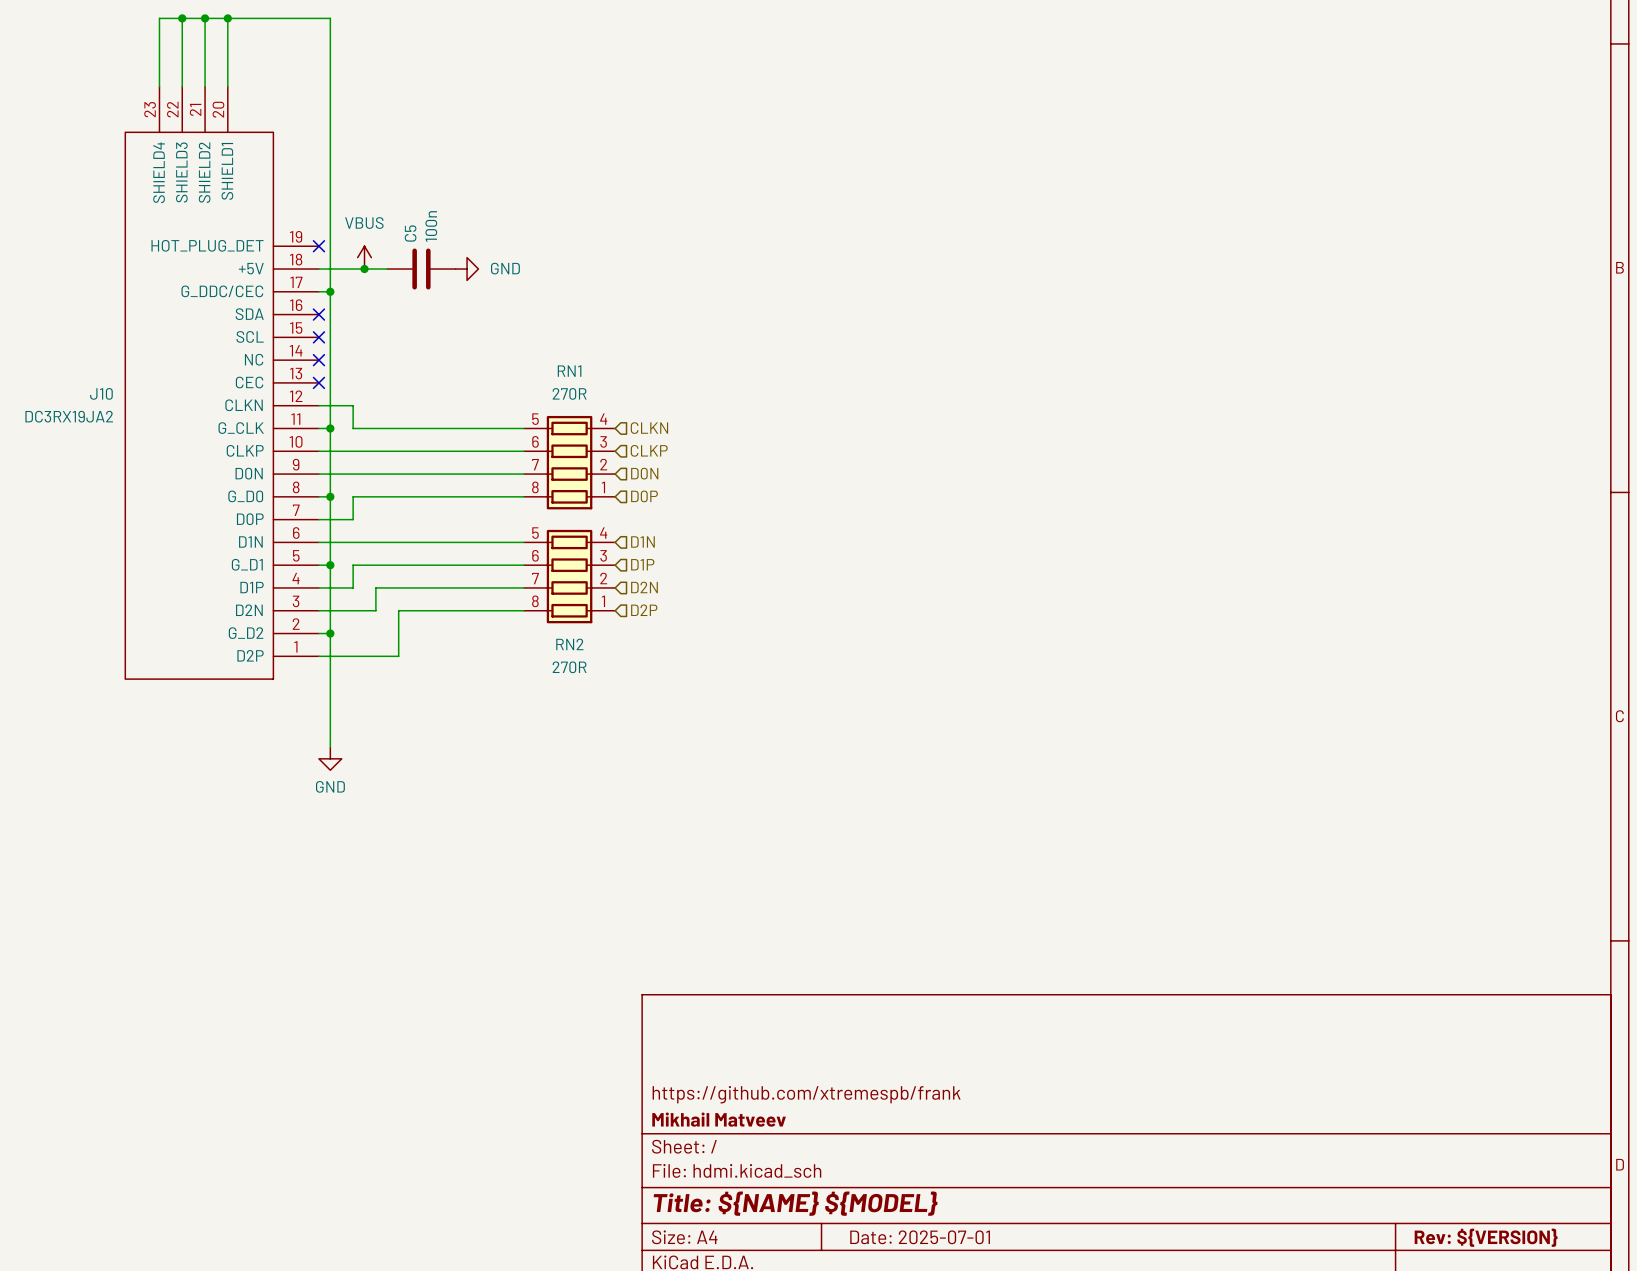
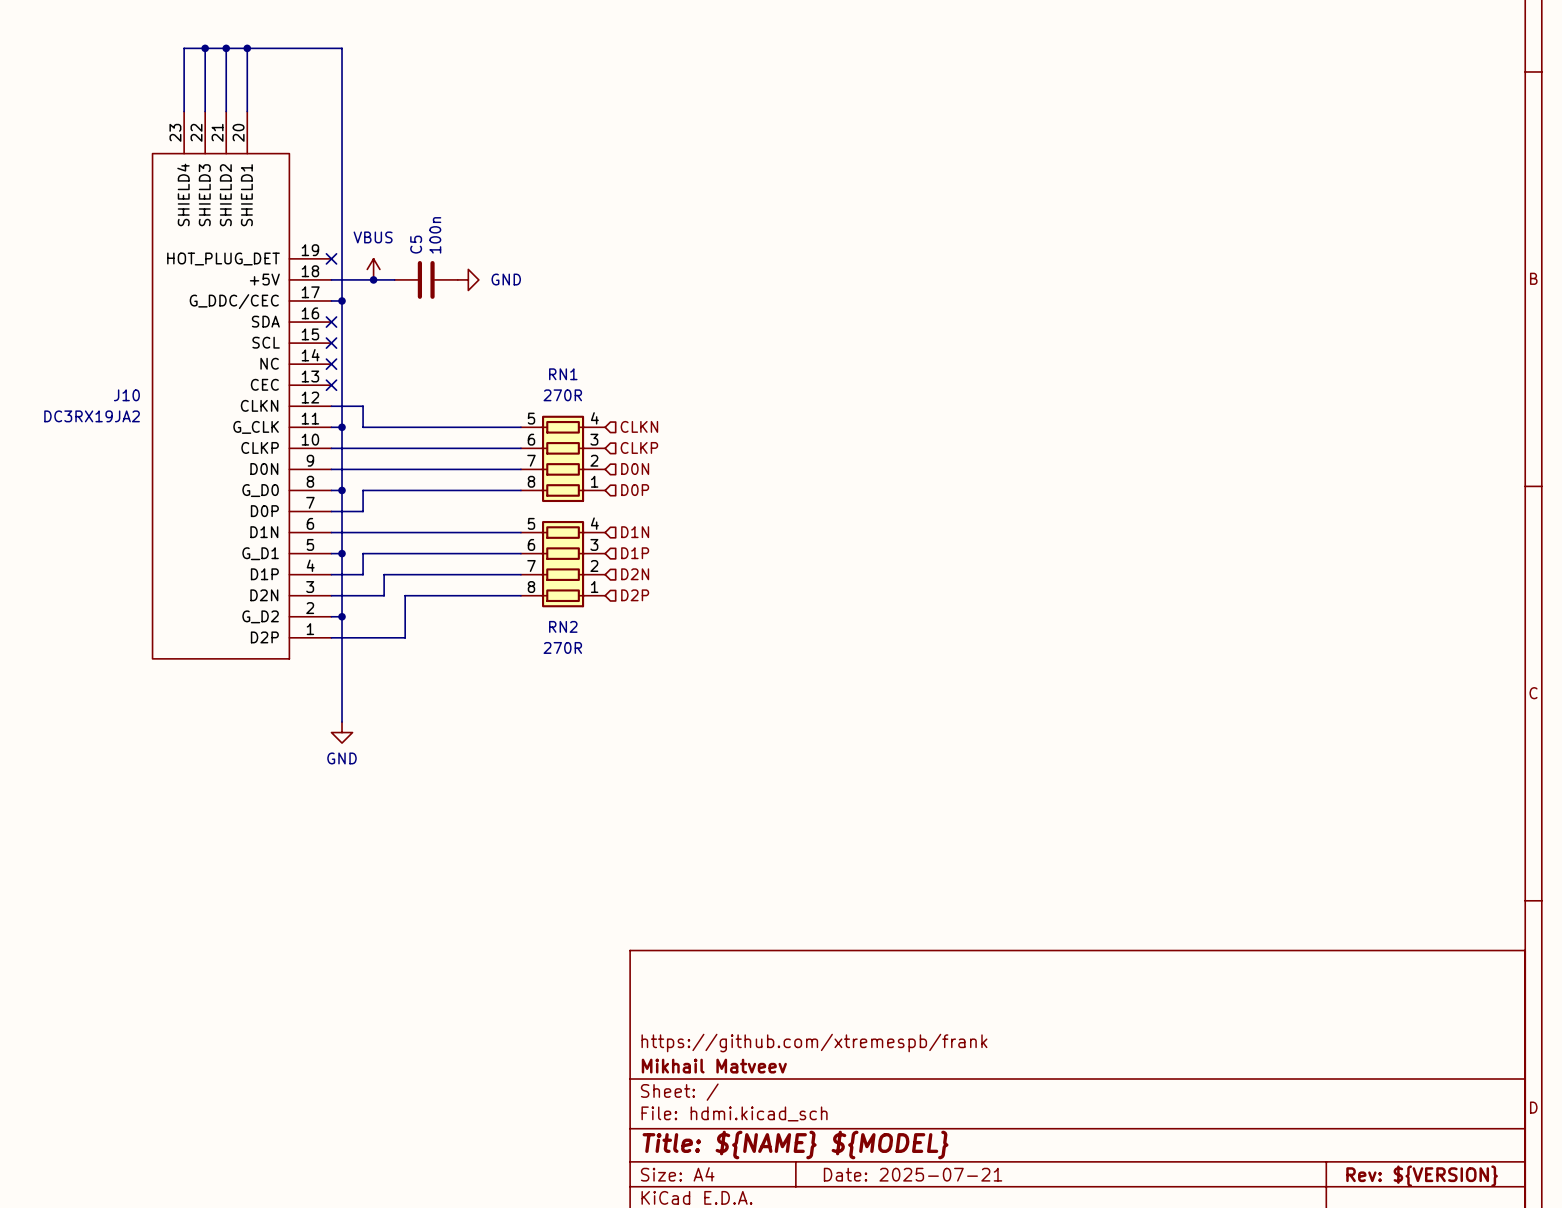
title block: Date: 2025-07-01 (920, 1237) -> Date: 2025-07-21 (913, 1174)

